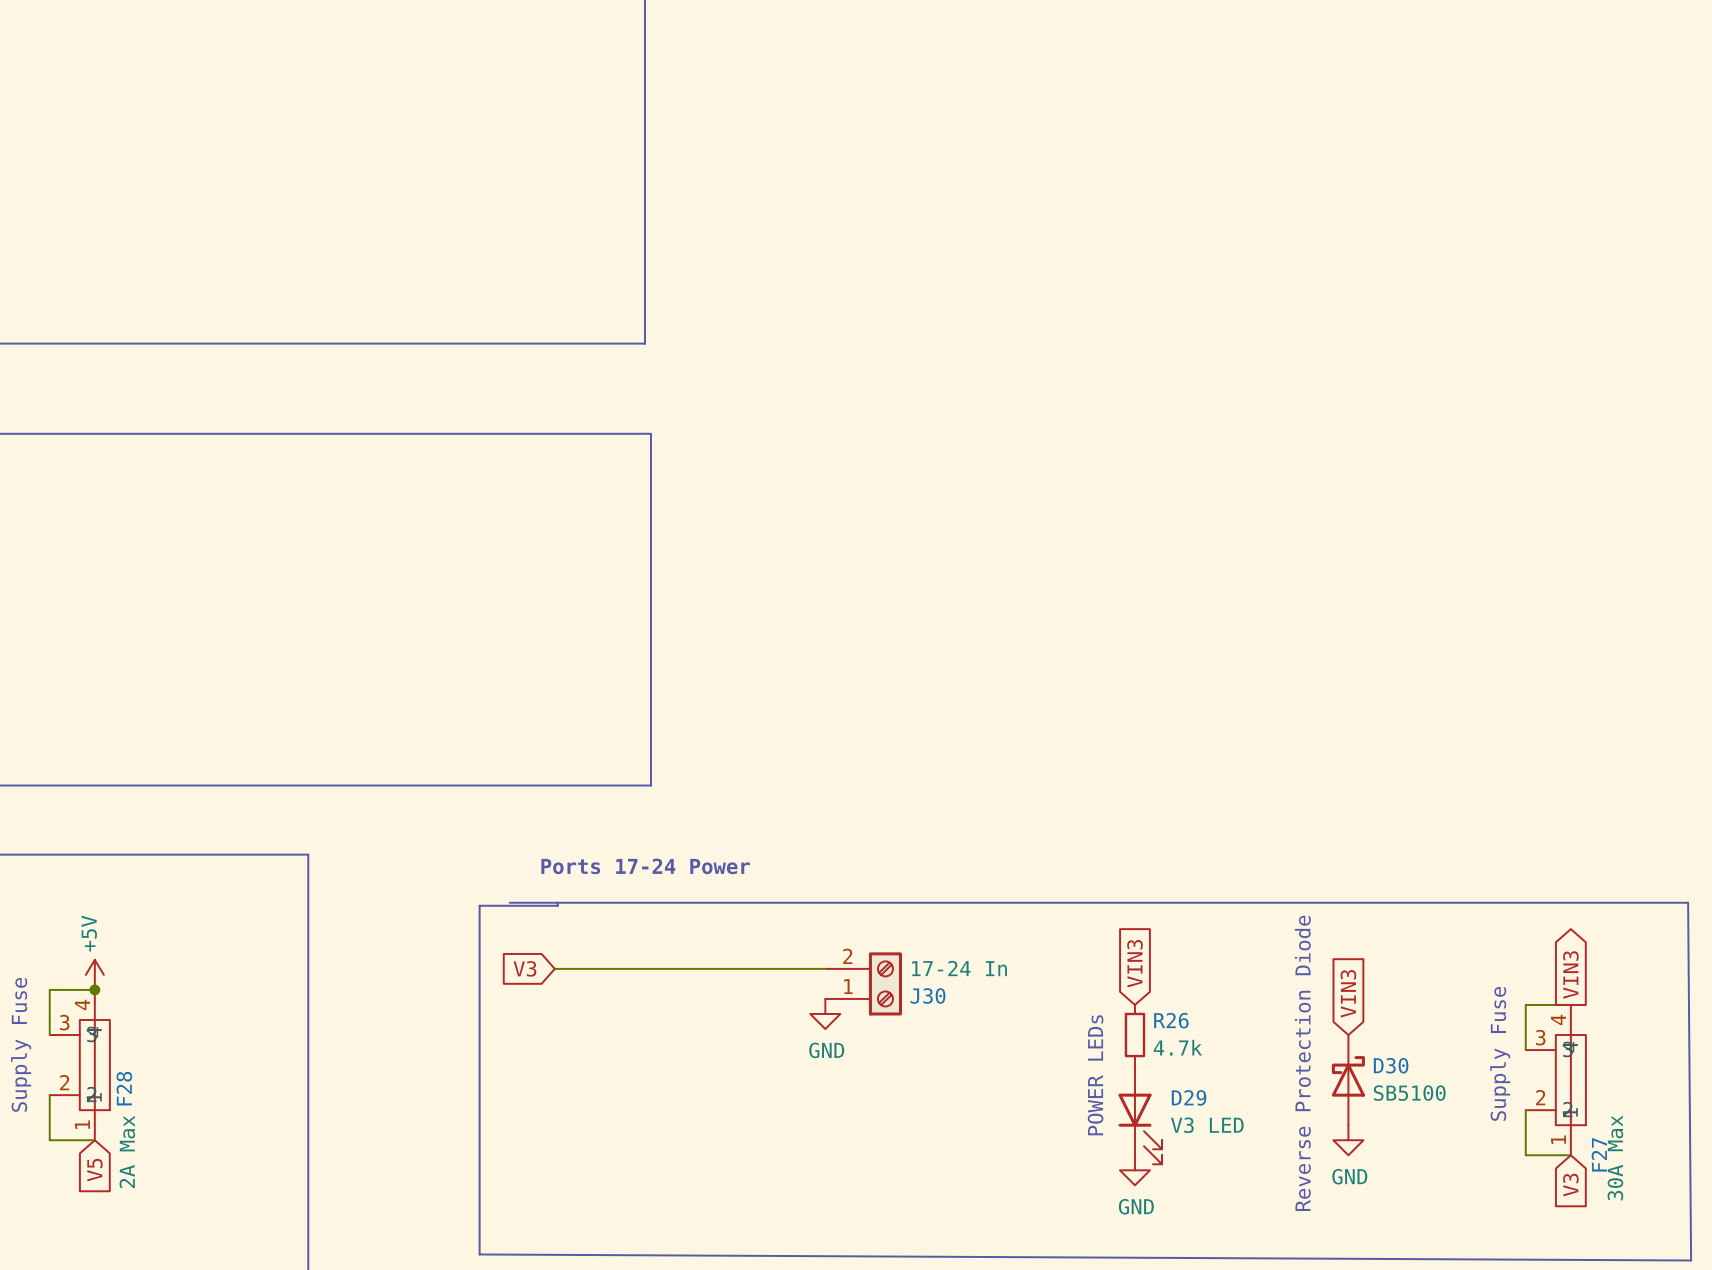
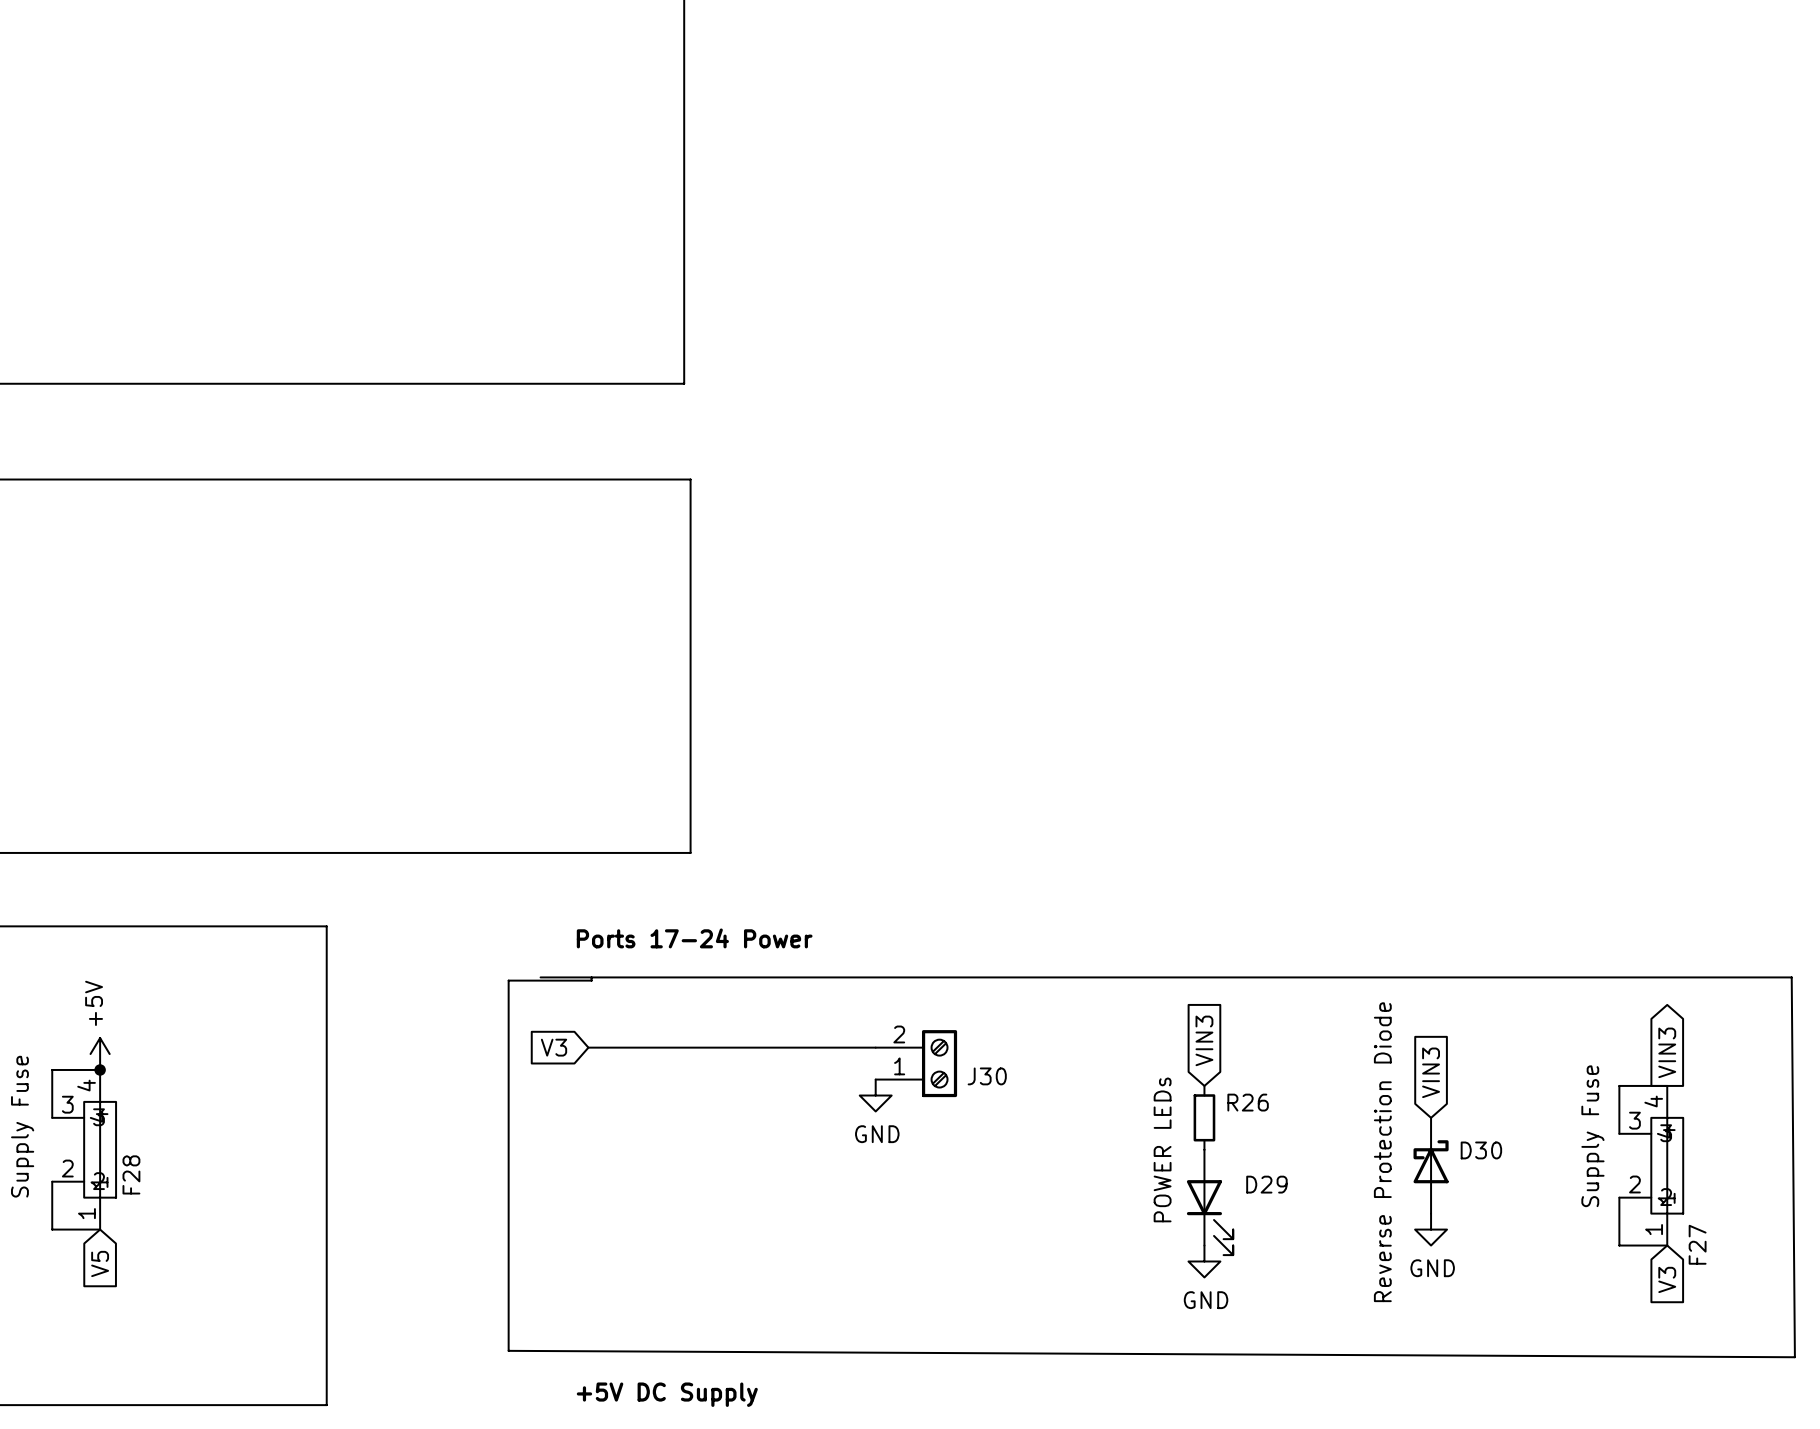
J30 value: 17-24 In (959, 968) -> none
R26 value: 4.7k (1177, 1047) -> none
D30 value: SB5100 (1409, 1093) -> none
D29 value: V3 LED (1207, 1125) -> none
F28 value: 2A Max (127, 1151) -> none
F27 value: 30A Max (1615, 1157) -> none

